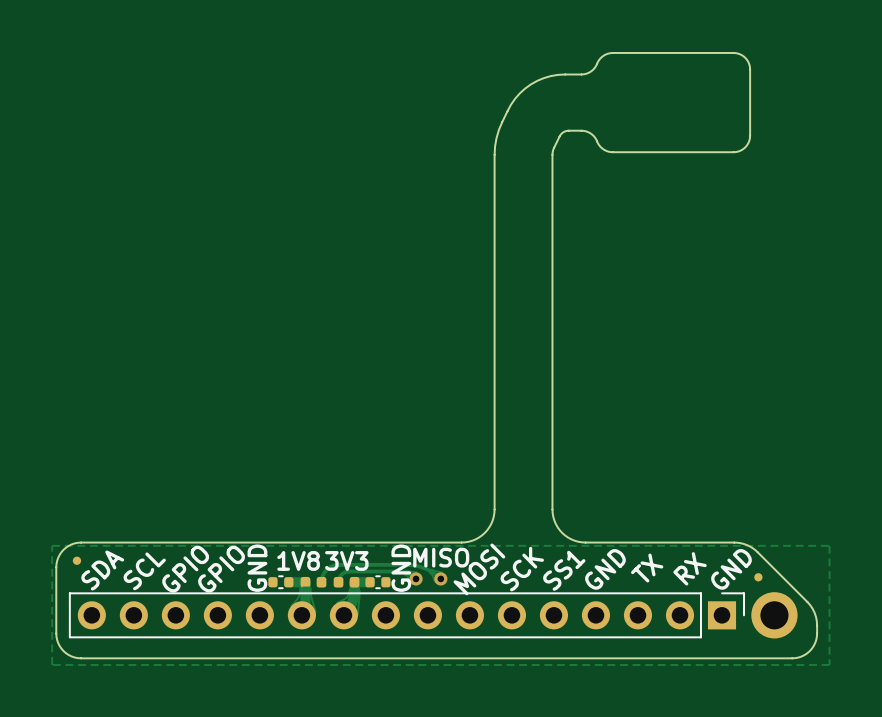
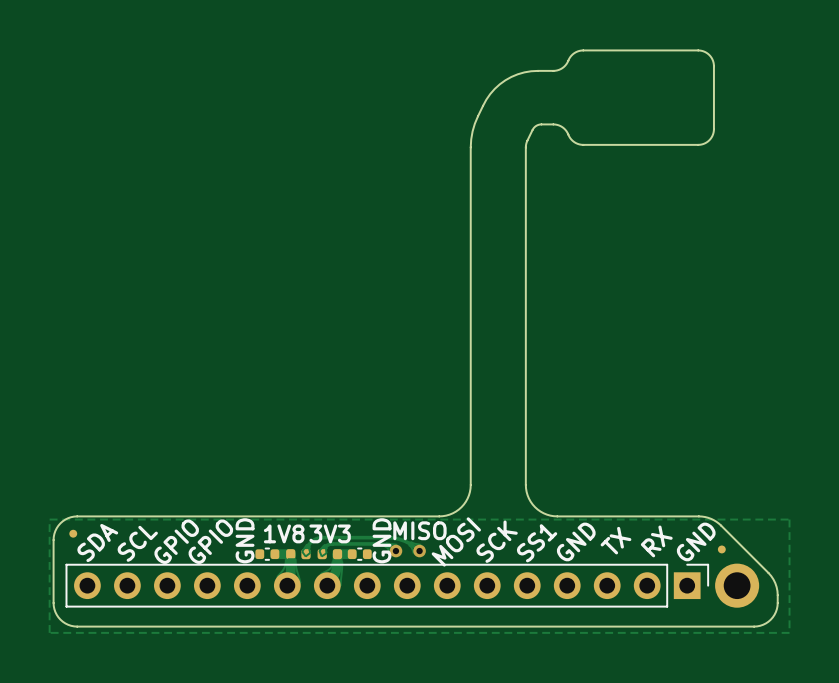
zone outline: none -> (307, 544) (302, 551) (305, 556) (310, 552) (310, 546) (307, 544)
zone outline: none -> (325, 544) (319, 550) (321, 556) (326, 553) (327, 547) (325, 544)

